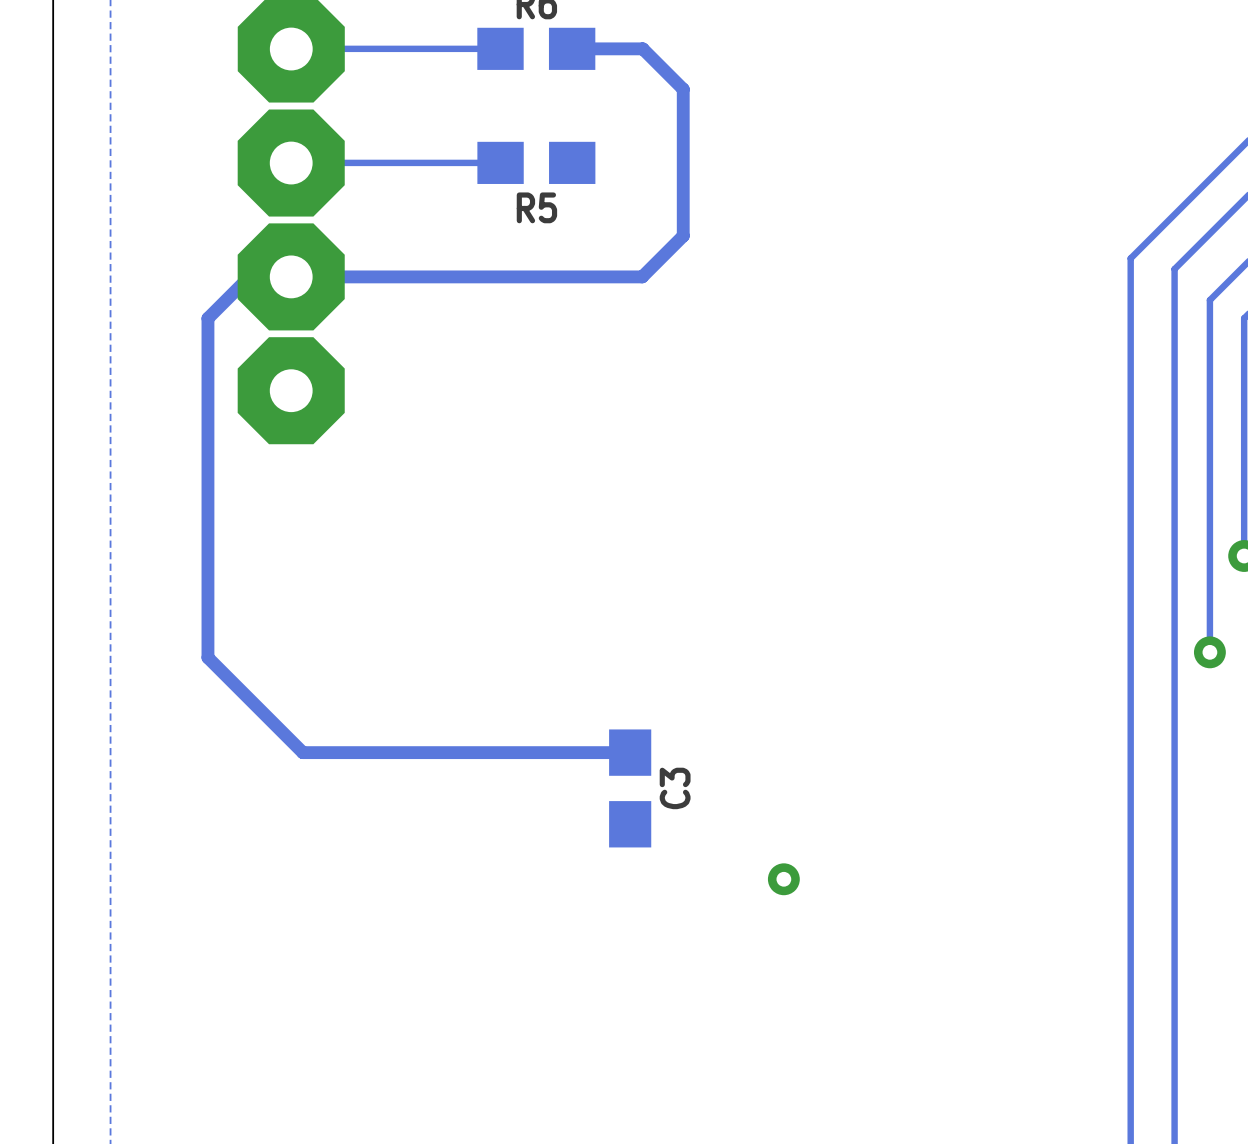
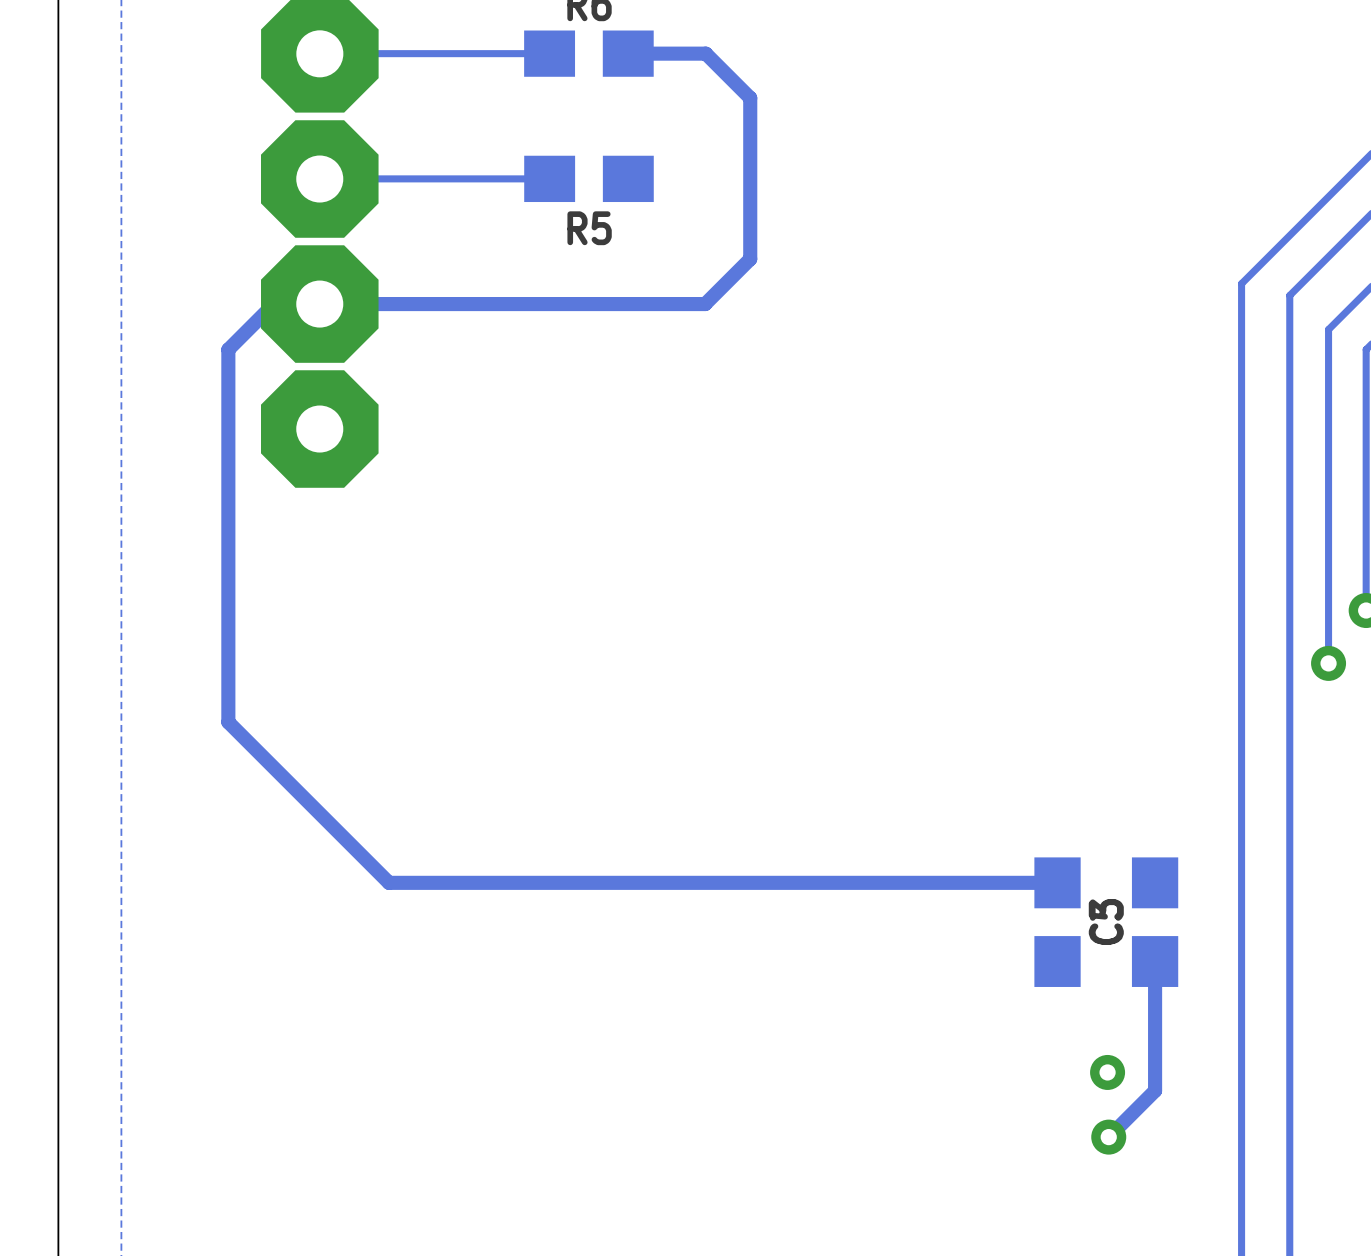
track: (1209, 604) (1209, 652) -> none
via position: (1209, 652) -> (1328, 663)
track: (630, 752) (302, 752) -> (1057, 882) (389, 882) (332, 826)
C3 position: (630, 788) -> (1057, 922)
part: none -> (1155, 922)
track: none -> (1155, 961) (1155, 1090) (1108, 1137)
via: (783, 879) -> none
via: none -> (1107, 1072)
via: none -> (1108, 1137)

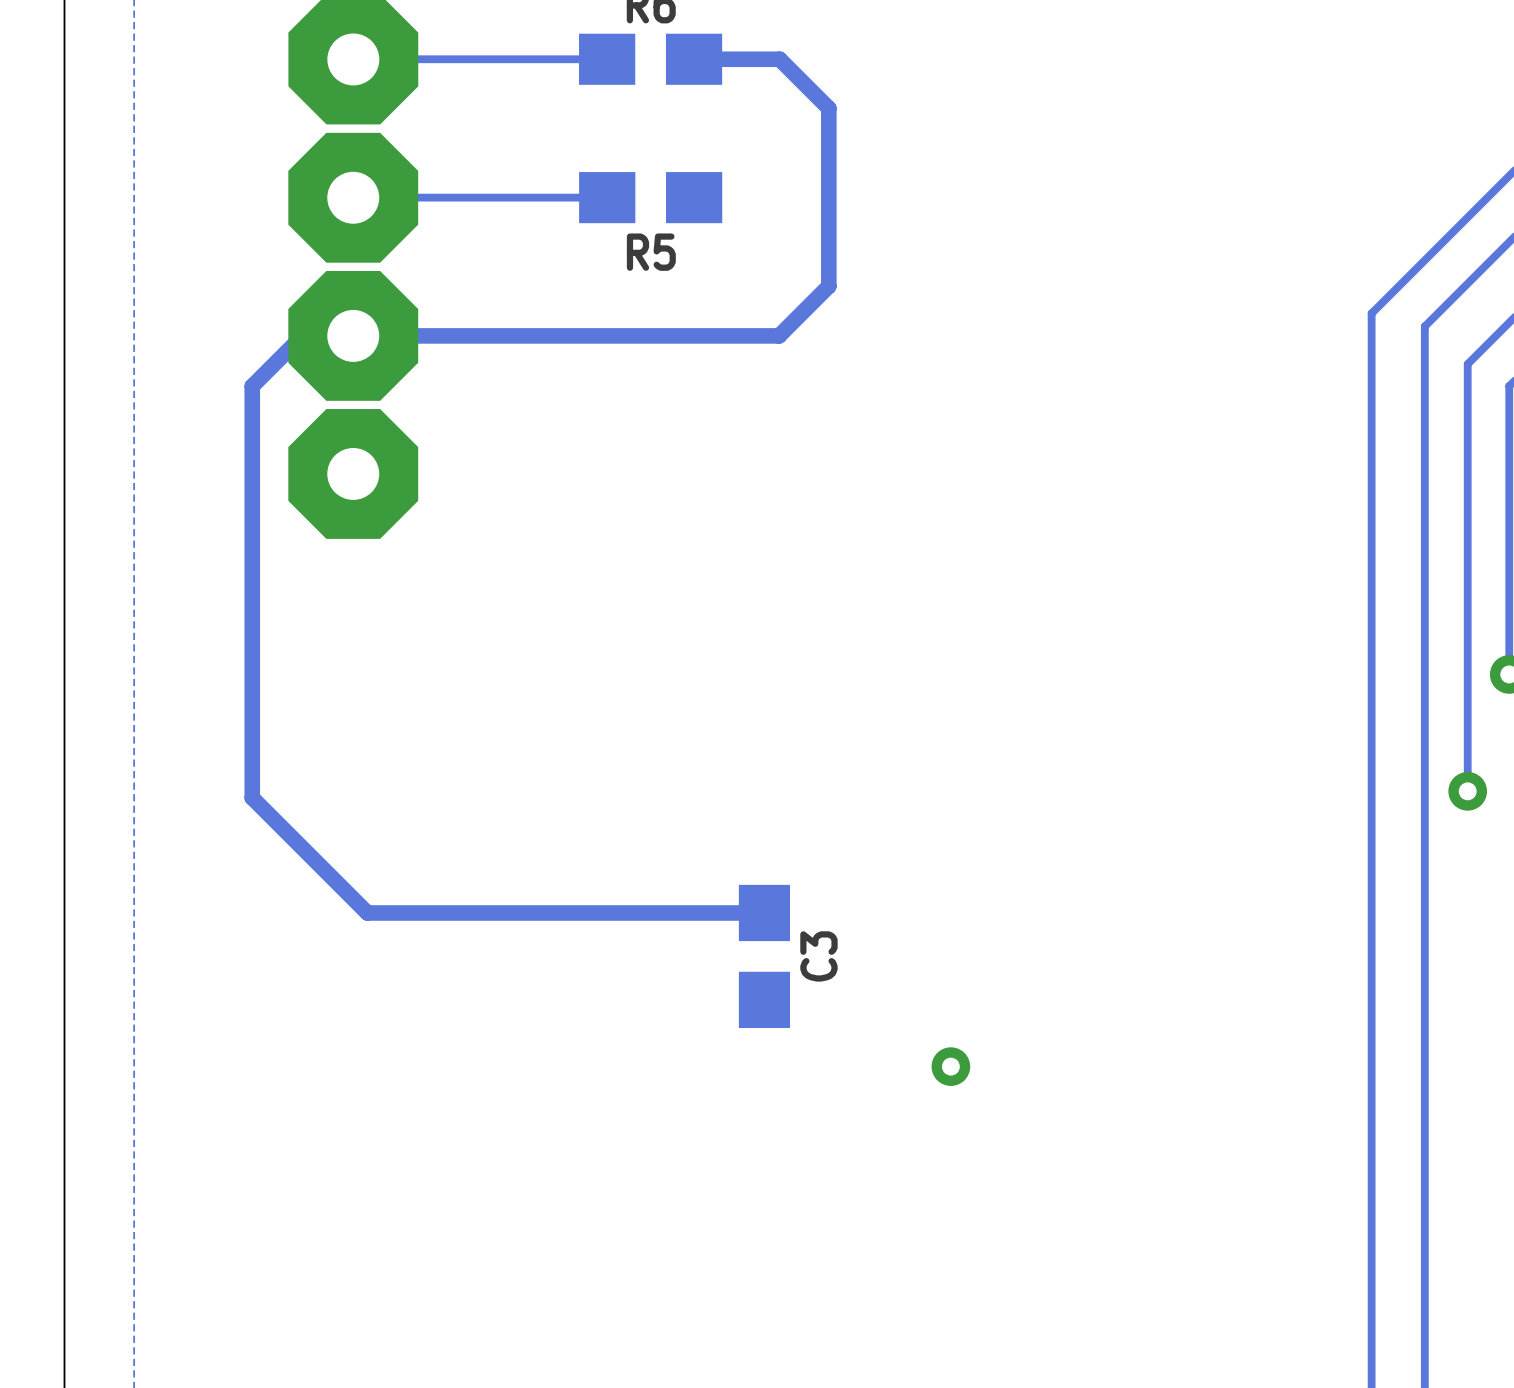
track: none -> (1467, 732) (1467, 791)
via position: (1328, 663) -> (1467, 791)
track: (332, 826) (389, 882) (1057, 882) -> (367, 912) (764, 912)
C3 position: (1057, 922) -> (764, 956)
part: (1155, 922) -> none
track: (1155, 961) (1155, 1090) (1108, 1137) -> none
via: none -> (950, 1066)
via: (1107, 1072) -> none
via: (1108, 1137) -> none

